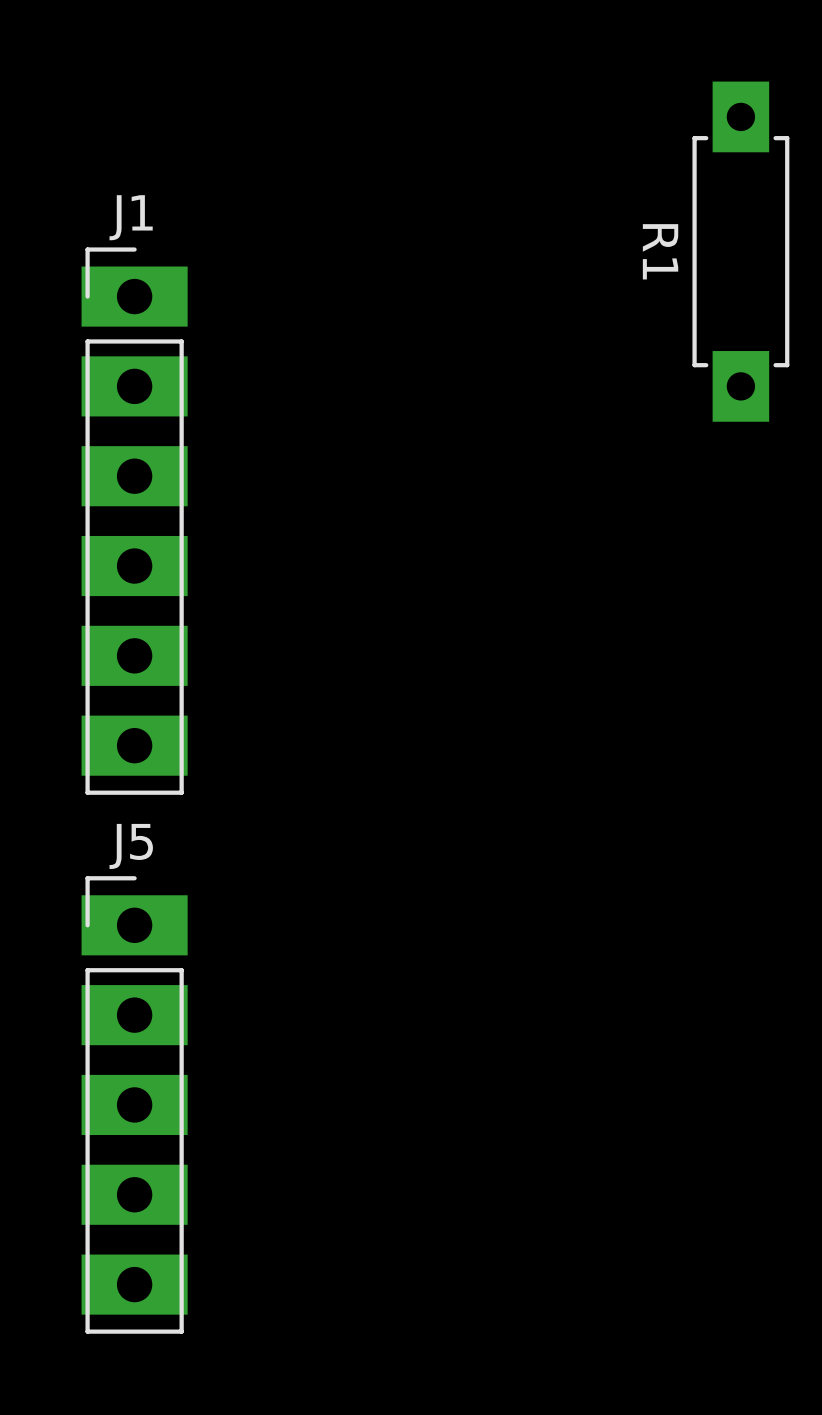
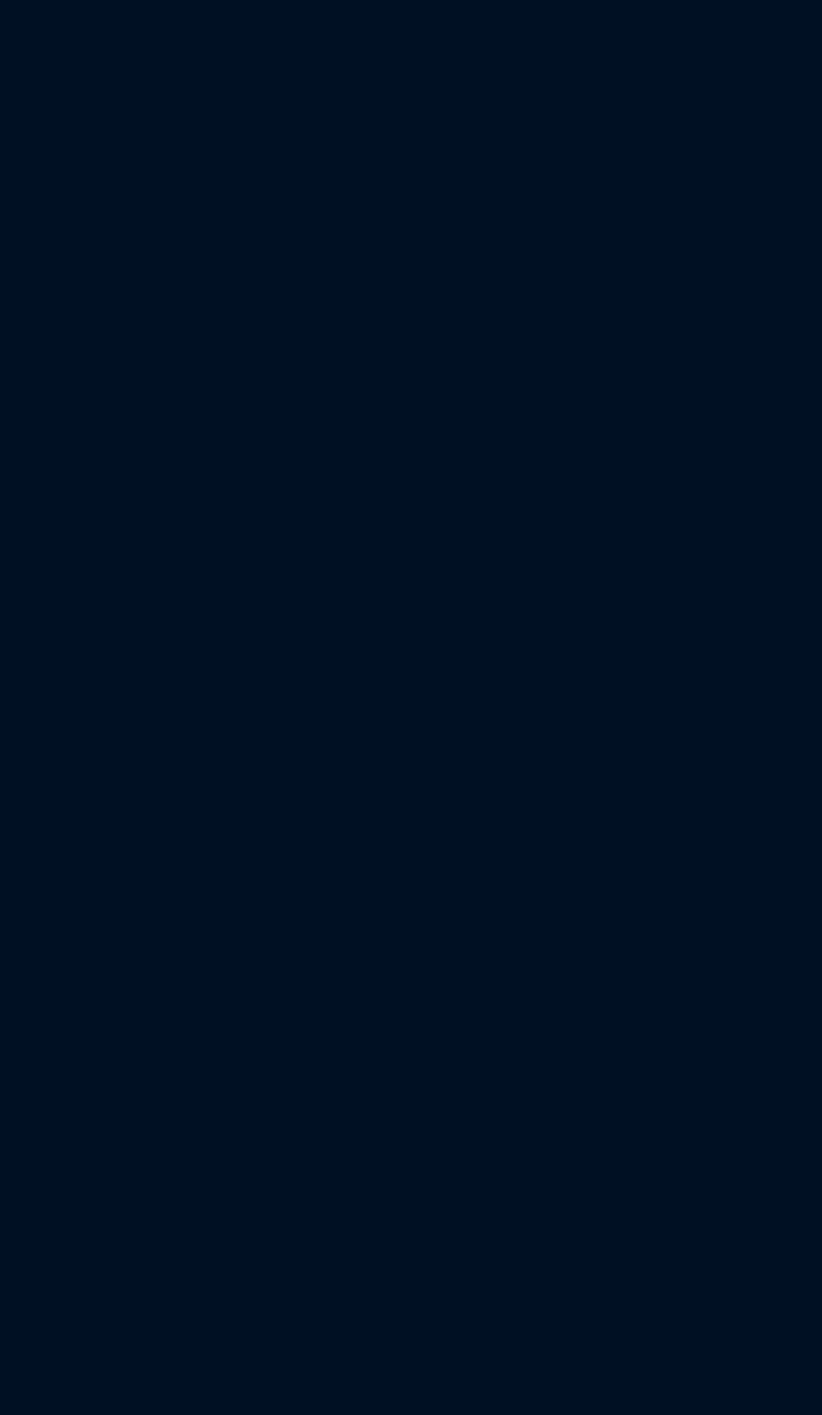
R1: (740, 251) -> none
J1: (134, 521) -> none
J5: (134, 1104) -> none

